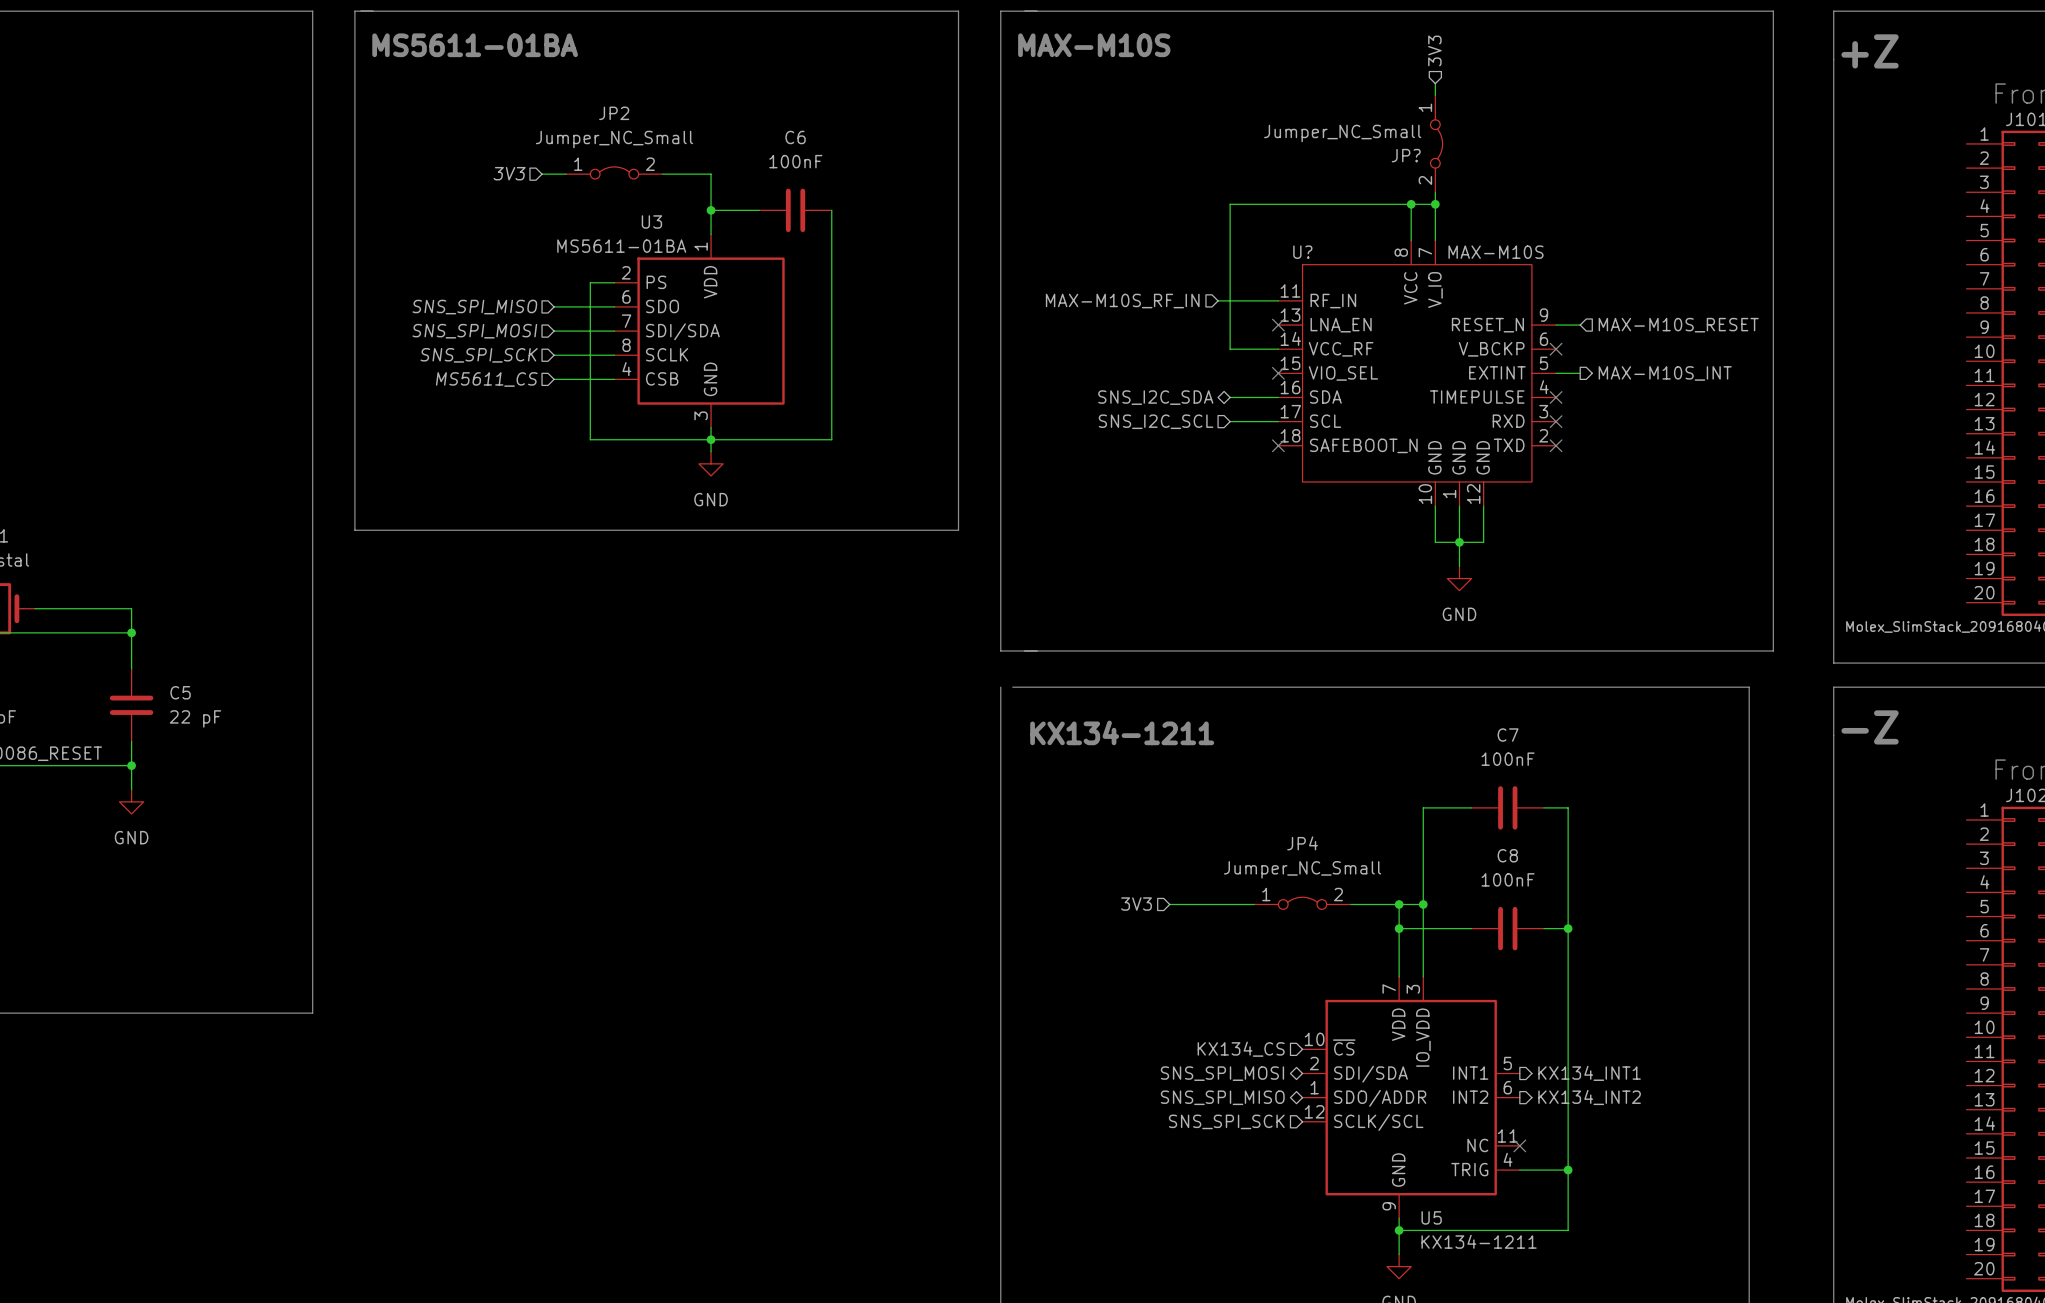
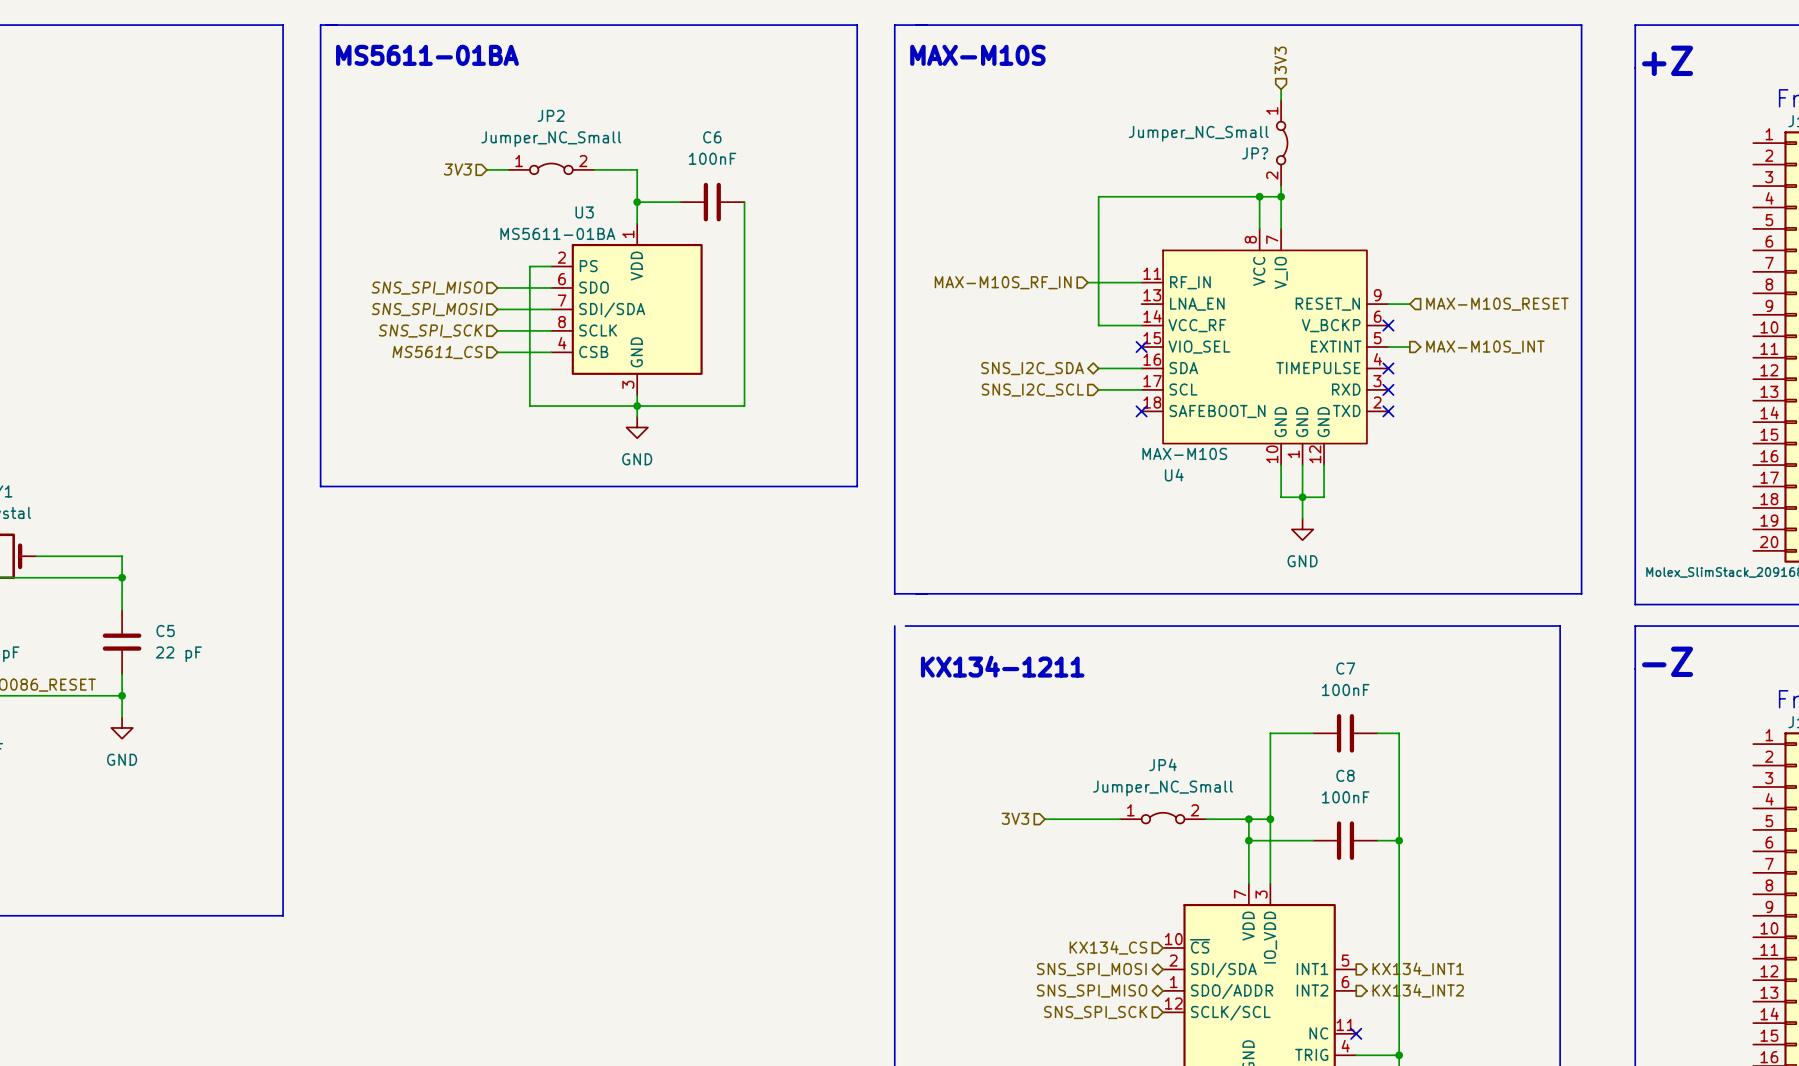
U? name: U? (1302, 252) -> U4 (1174, 475)
U? value position: MAX-M10S (1495, 252) -> MAX-M10S (1184, 453)
no-connect mark: (1278, 325) -> none

